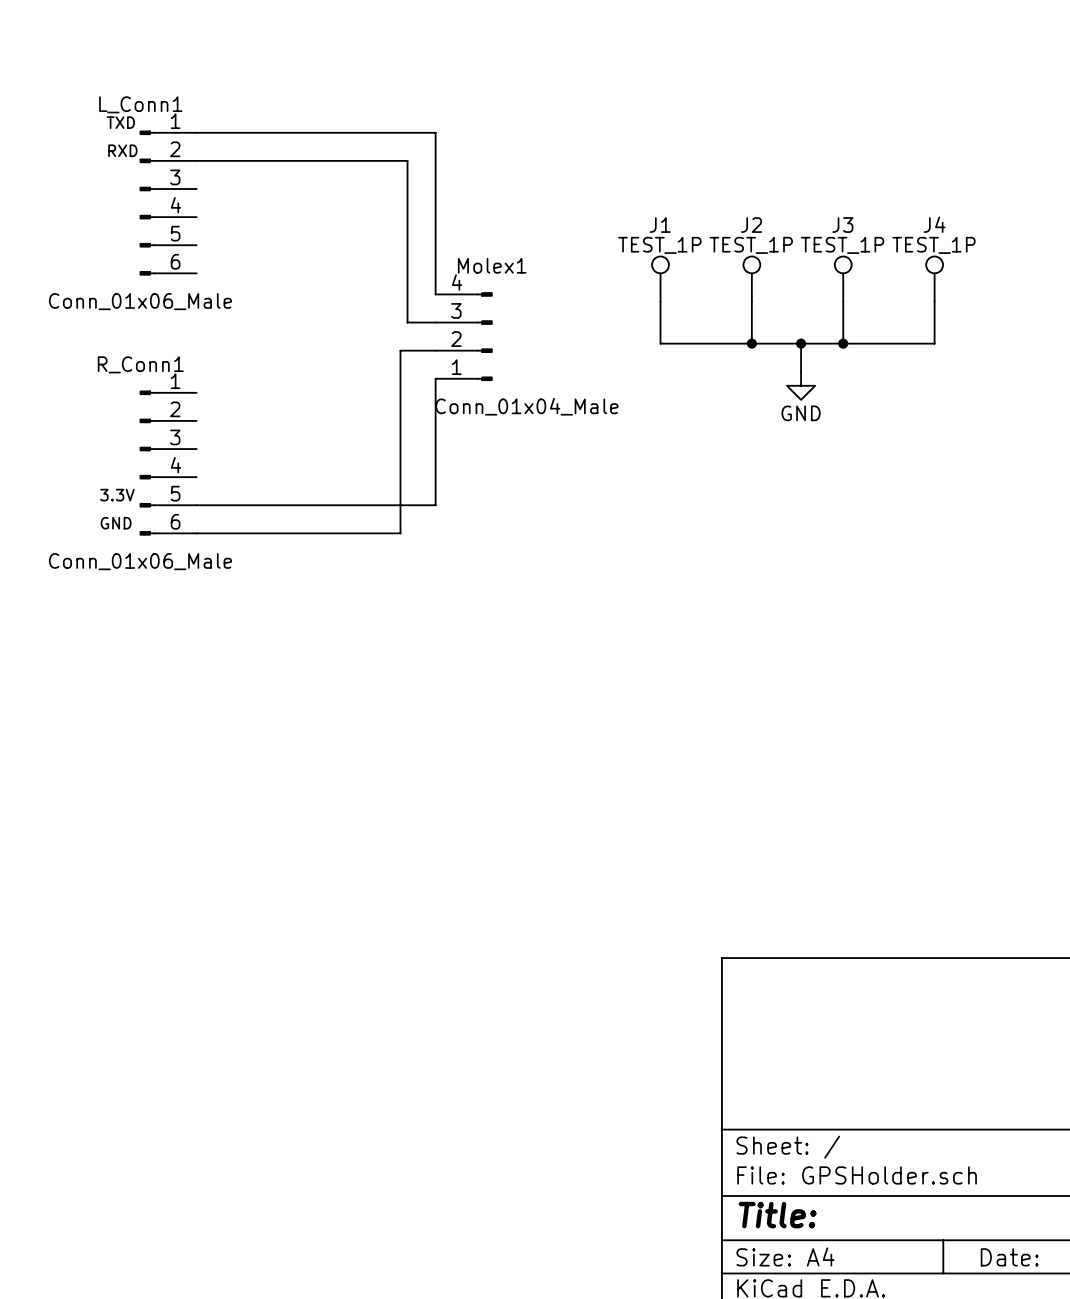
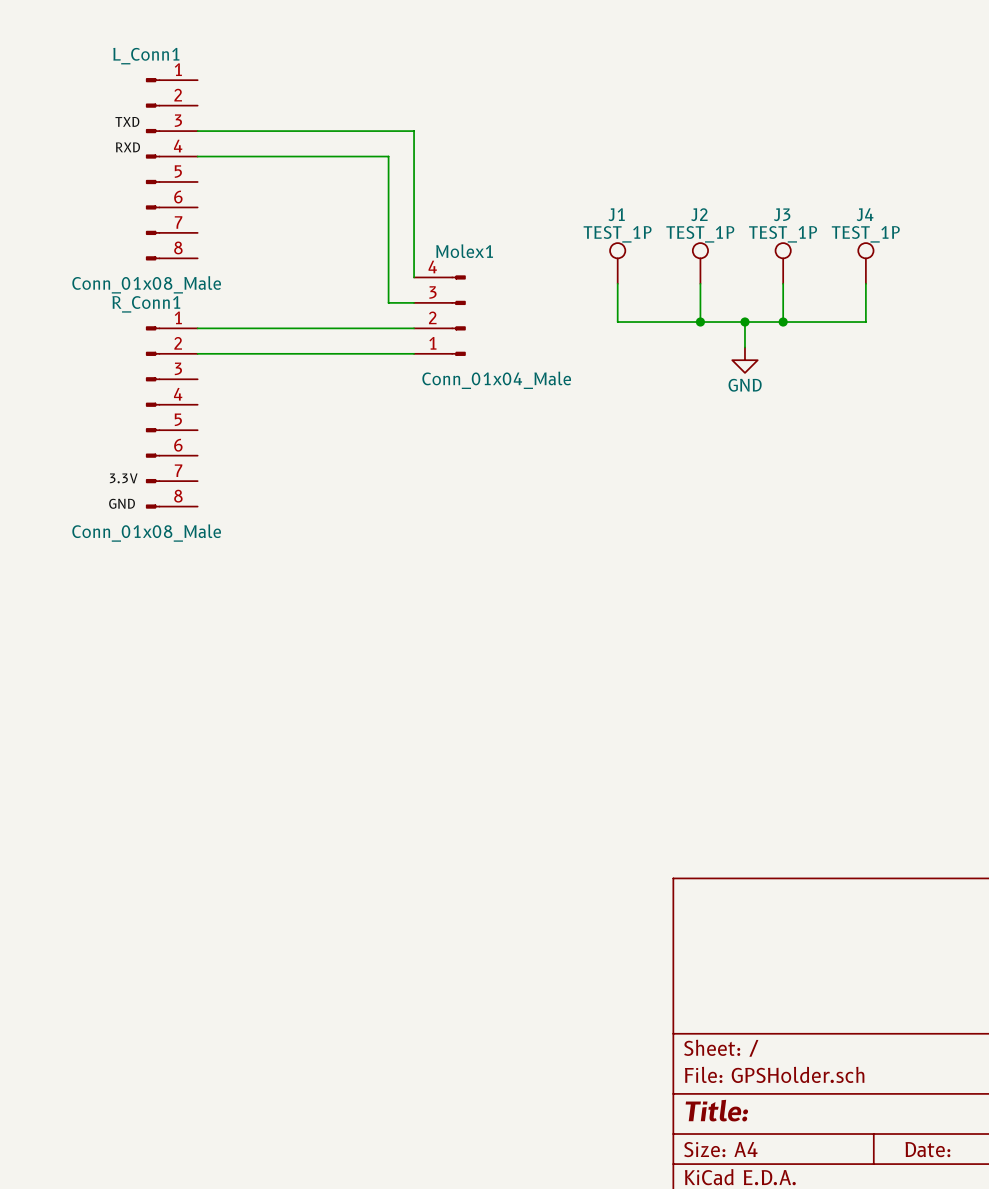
L_Conn1 name position: L_Conn1 (140, 104) -> L_Conn1 (146, 56)
L_Conn1 symbol: [139, 130, 197, 276] -> [145, 78, 198, 261]
L_Conn1 value: Conn_01x06_Male (140, 301) -> Conn_01x08_Male (146, 284)
wire: (400, 350) (400, 533) (196, 533) -> (382, 328) (197, 328)
R_Conn1 name position: R_Conn1 (140, 364) -> R_Conn1 (146, 304)
wire: (435, 378) (435, 505) (196, 505) -> (414, 353) (197, 353)
R_Conn1 symbol: [139, 390, 197, 536] -> [145, 326, 198, 509]
label: 3.3V (117, 495) -> none
label: GND (116, 523) -> 3.3V (123, 478)
label: none -> GND (122, 503)
R_Conn1 value: Conn_01x06_Male (140, 561) -> Conn_01x08_Male (146, 533)

